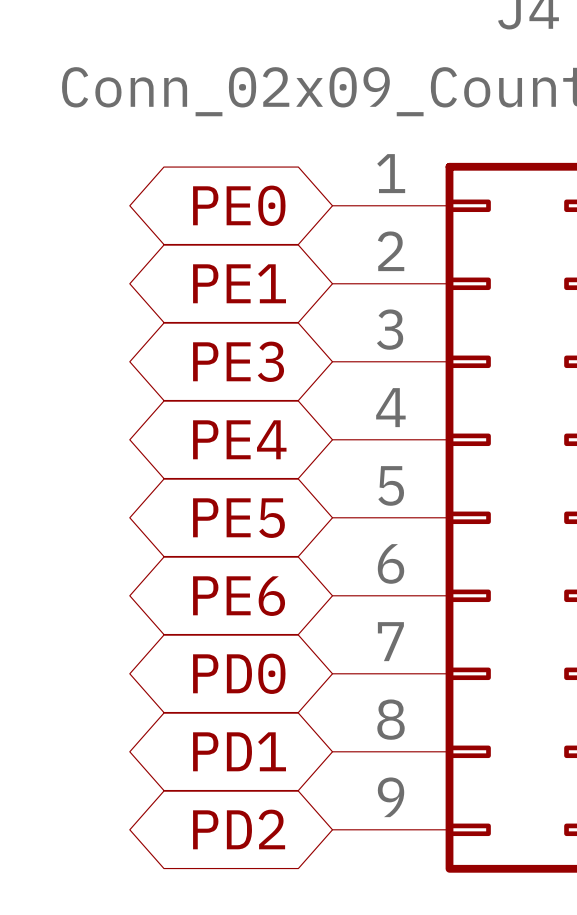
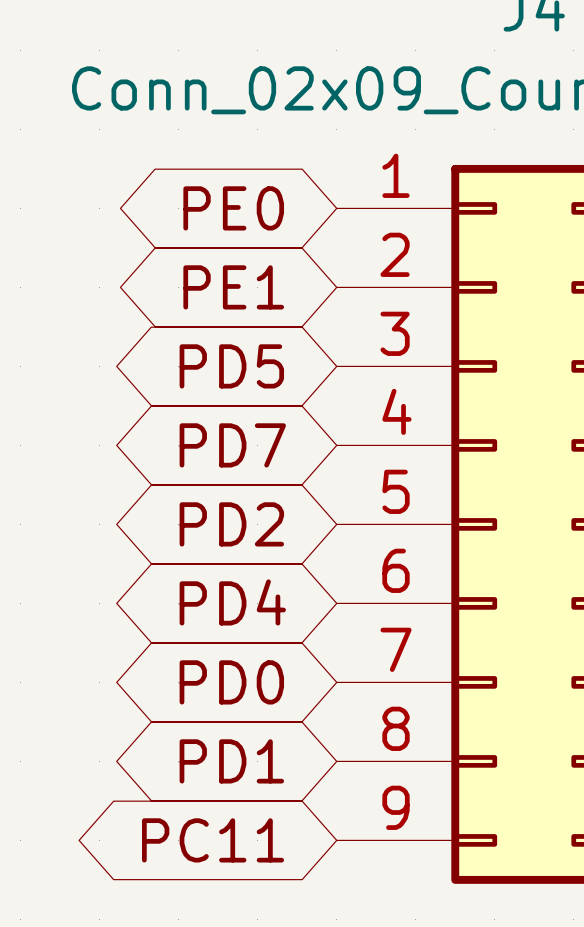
global label: PE3 (238, 361) -> PD5 (231, 366)
global label: PE4 (239, 439) -> PD7 (232, 445)
global label: PE5 (238, 518) -> PD2 (231, 524)
global label: PE6 (239, 596) -> PD4 (232, 602)
global label: PD2 (239, 829) -> PC11 (213, 840)

